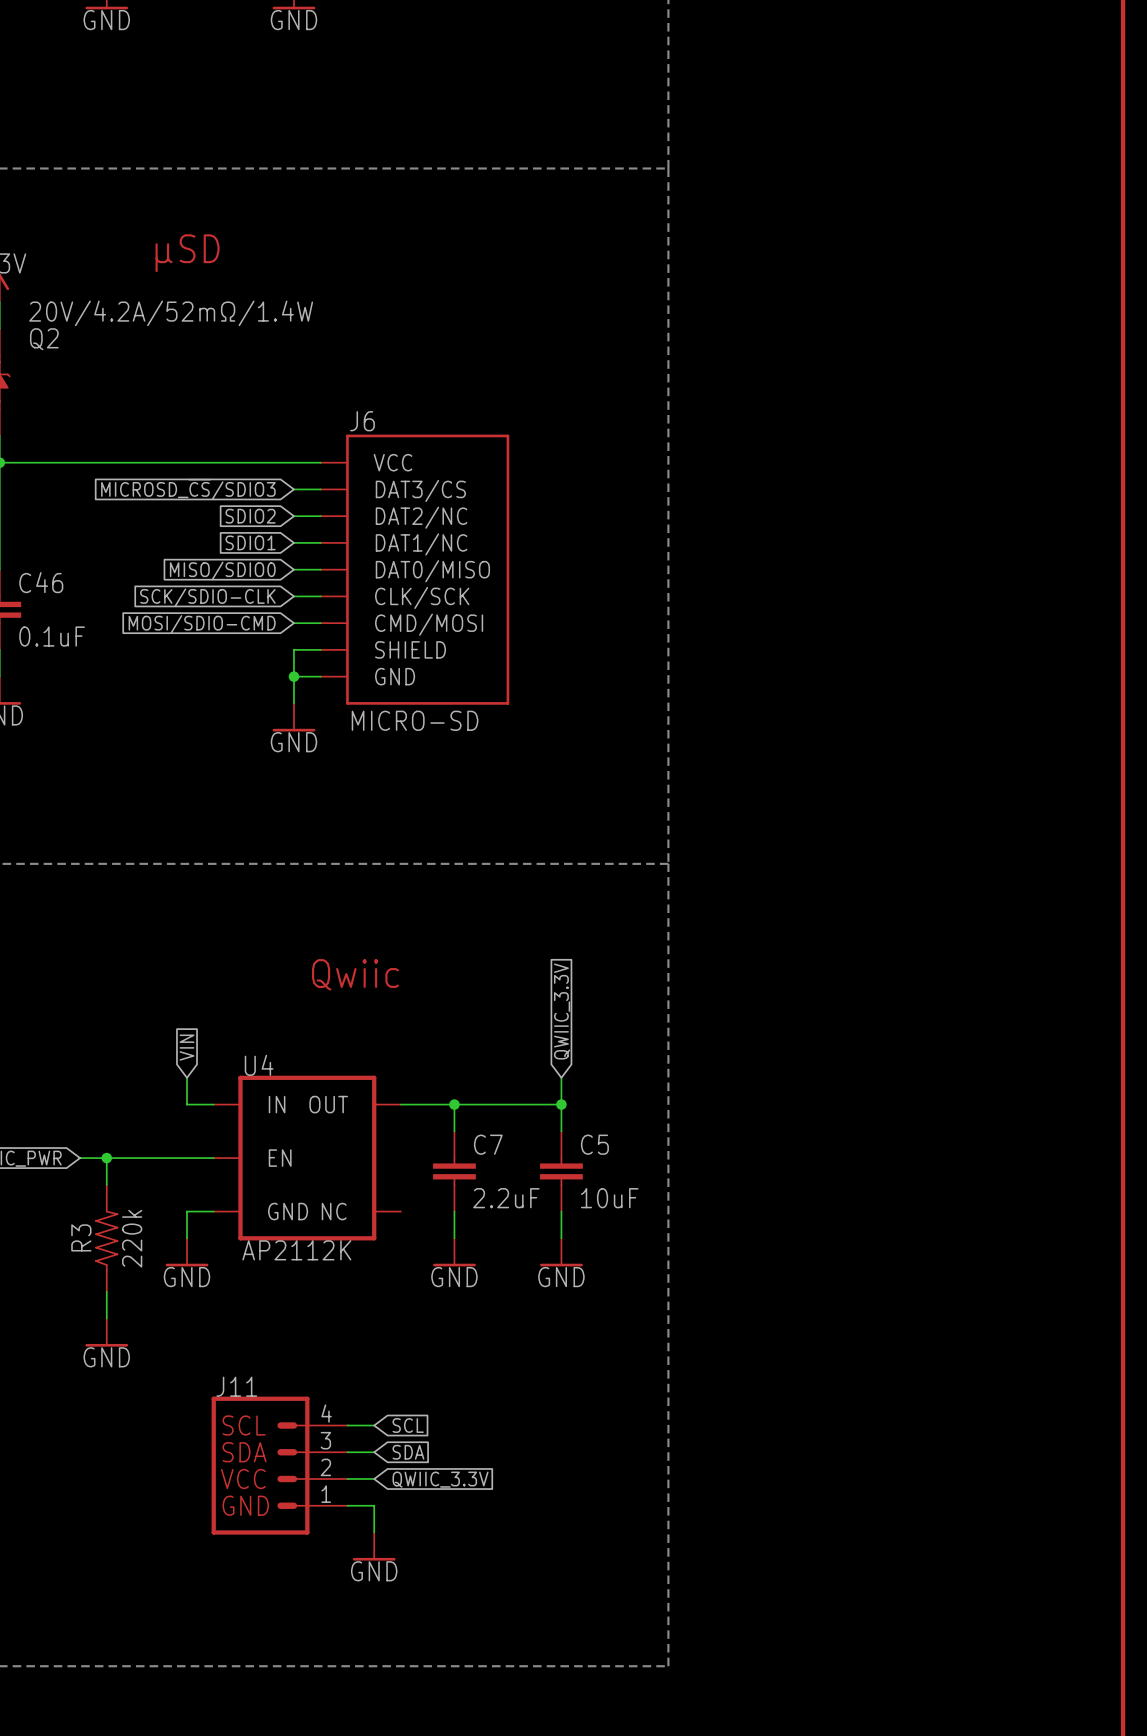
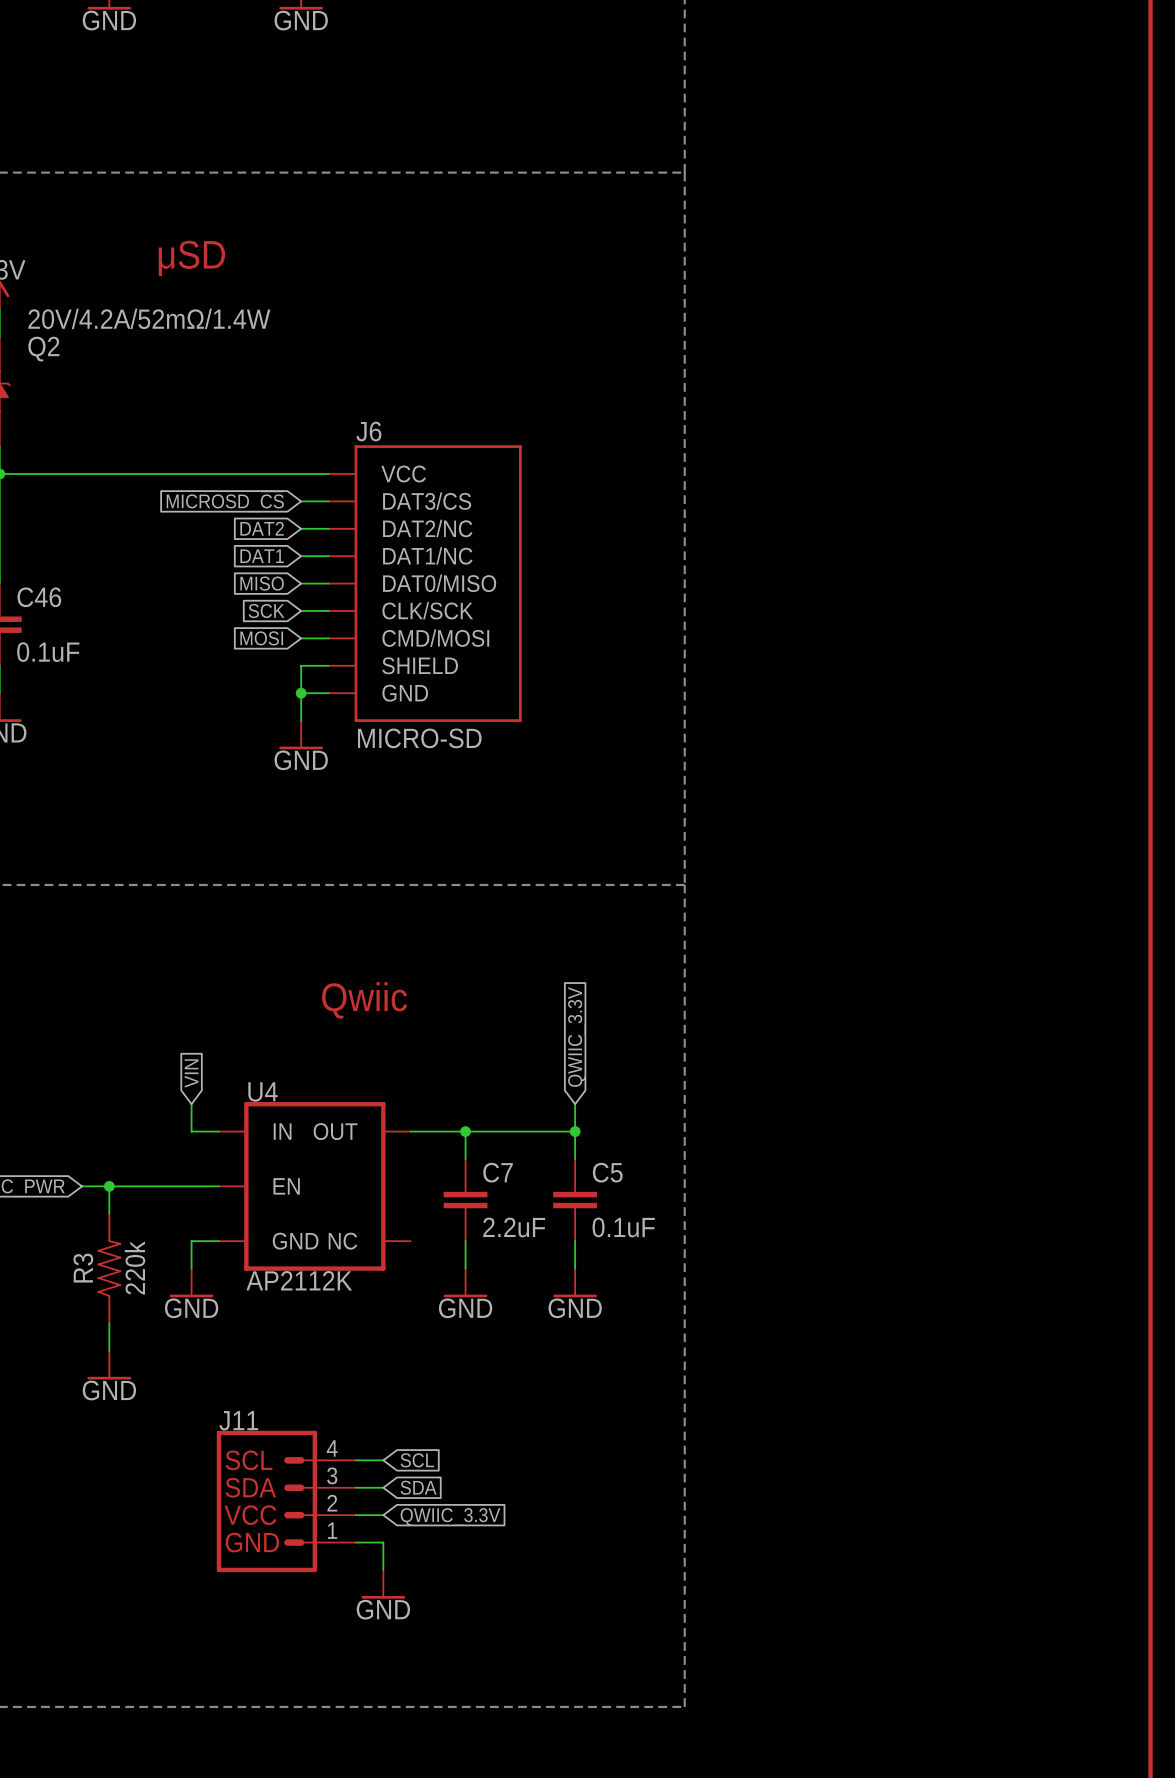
global label: MICROSD_~{CS}/SDIO3 (188, 489) -> MICROSD_~{CS} (225, 501)
global label: SDIO2 (250, 516) -> DAT2 (262, 528)
global label: SDIO1 (250, 542) -> DAT1 (262, 556)
global label: MISO/SDIO0 (222, 570) -> MISO (262, 583)
global label: SCK/SDIO-CLK (207, 597) -> SCK (266, 610)
global label: MOSI/SDIO-CMD (202, 624) -> MOSI (261, 638)
C5 value: 10uF (609, 1198) -> 0.1uF (623, 1227)

